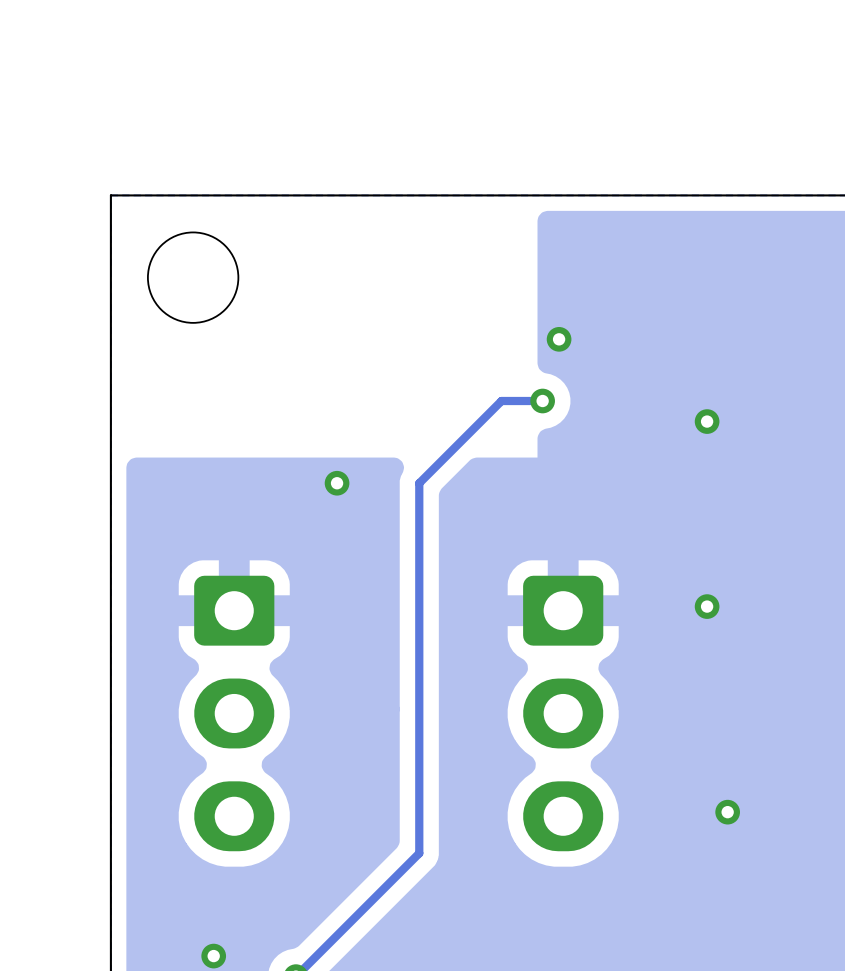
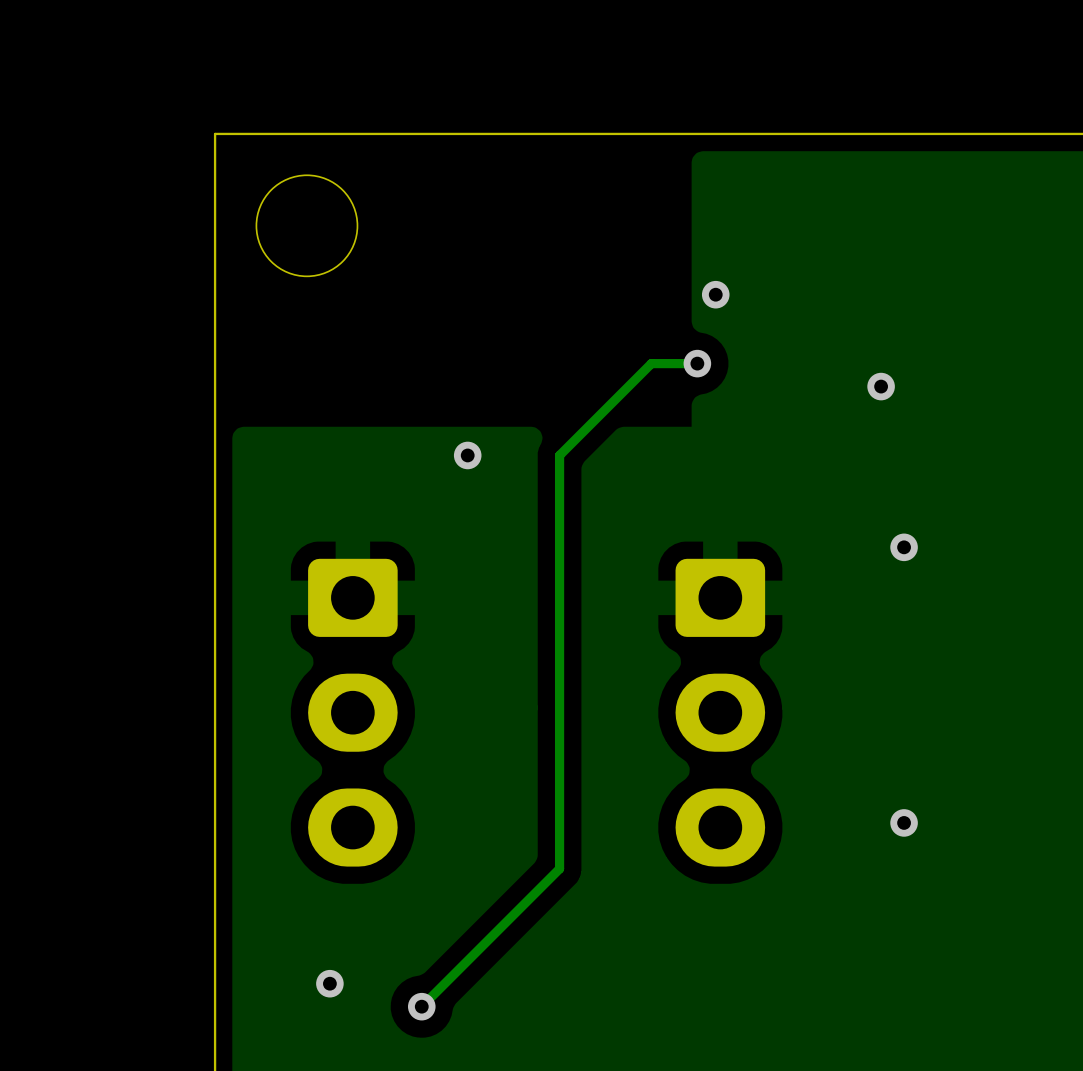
via position: (707, 606) -> (904, 547)

